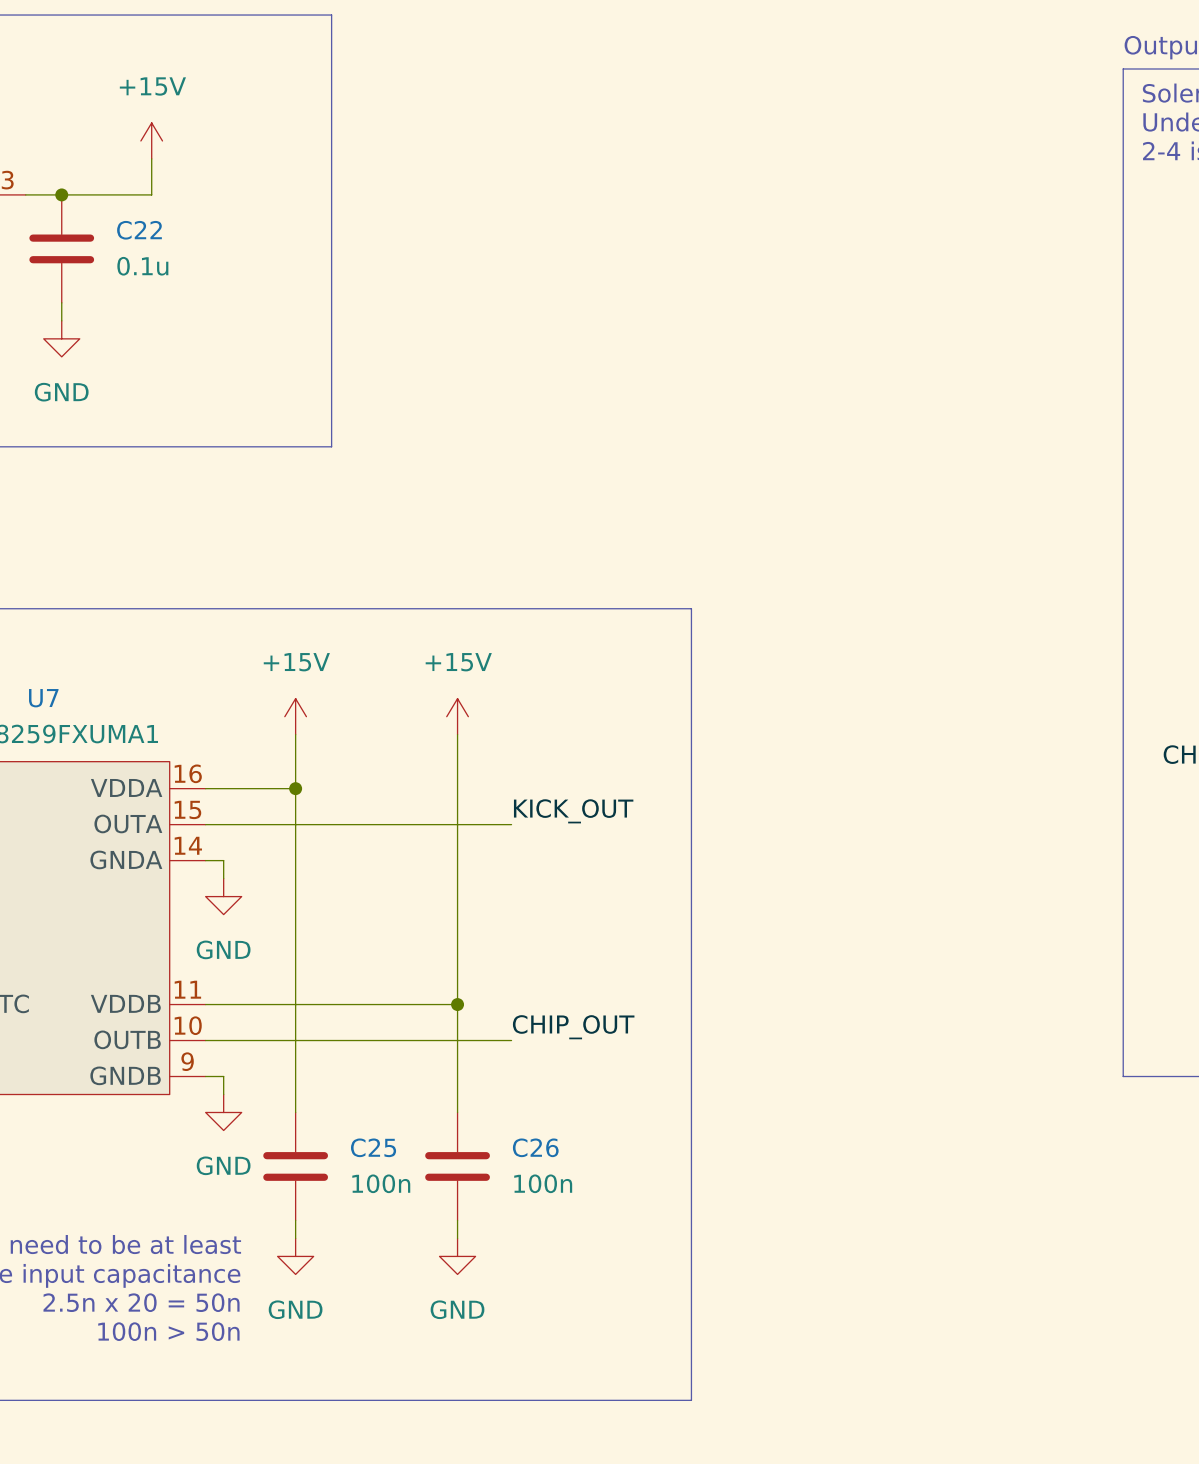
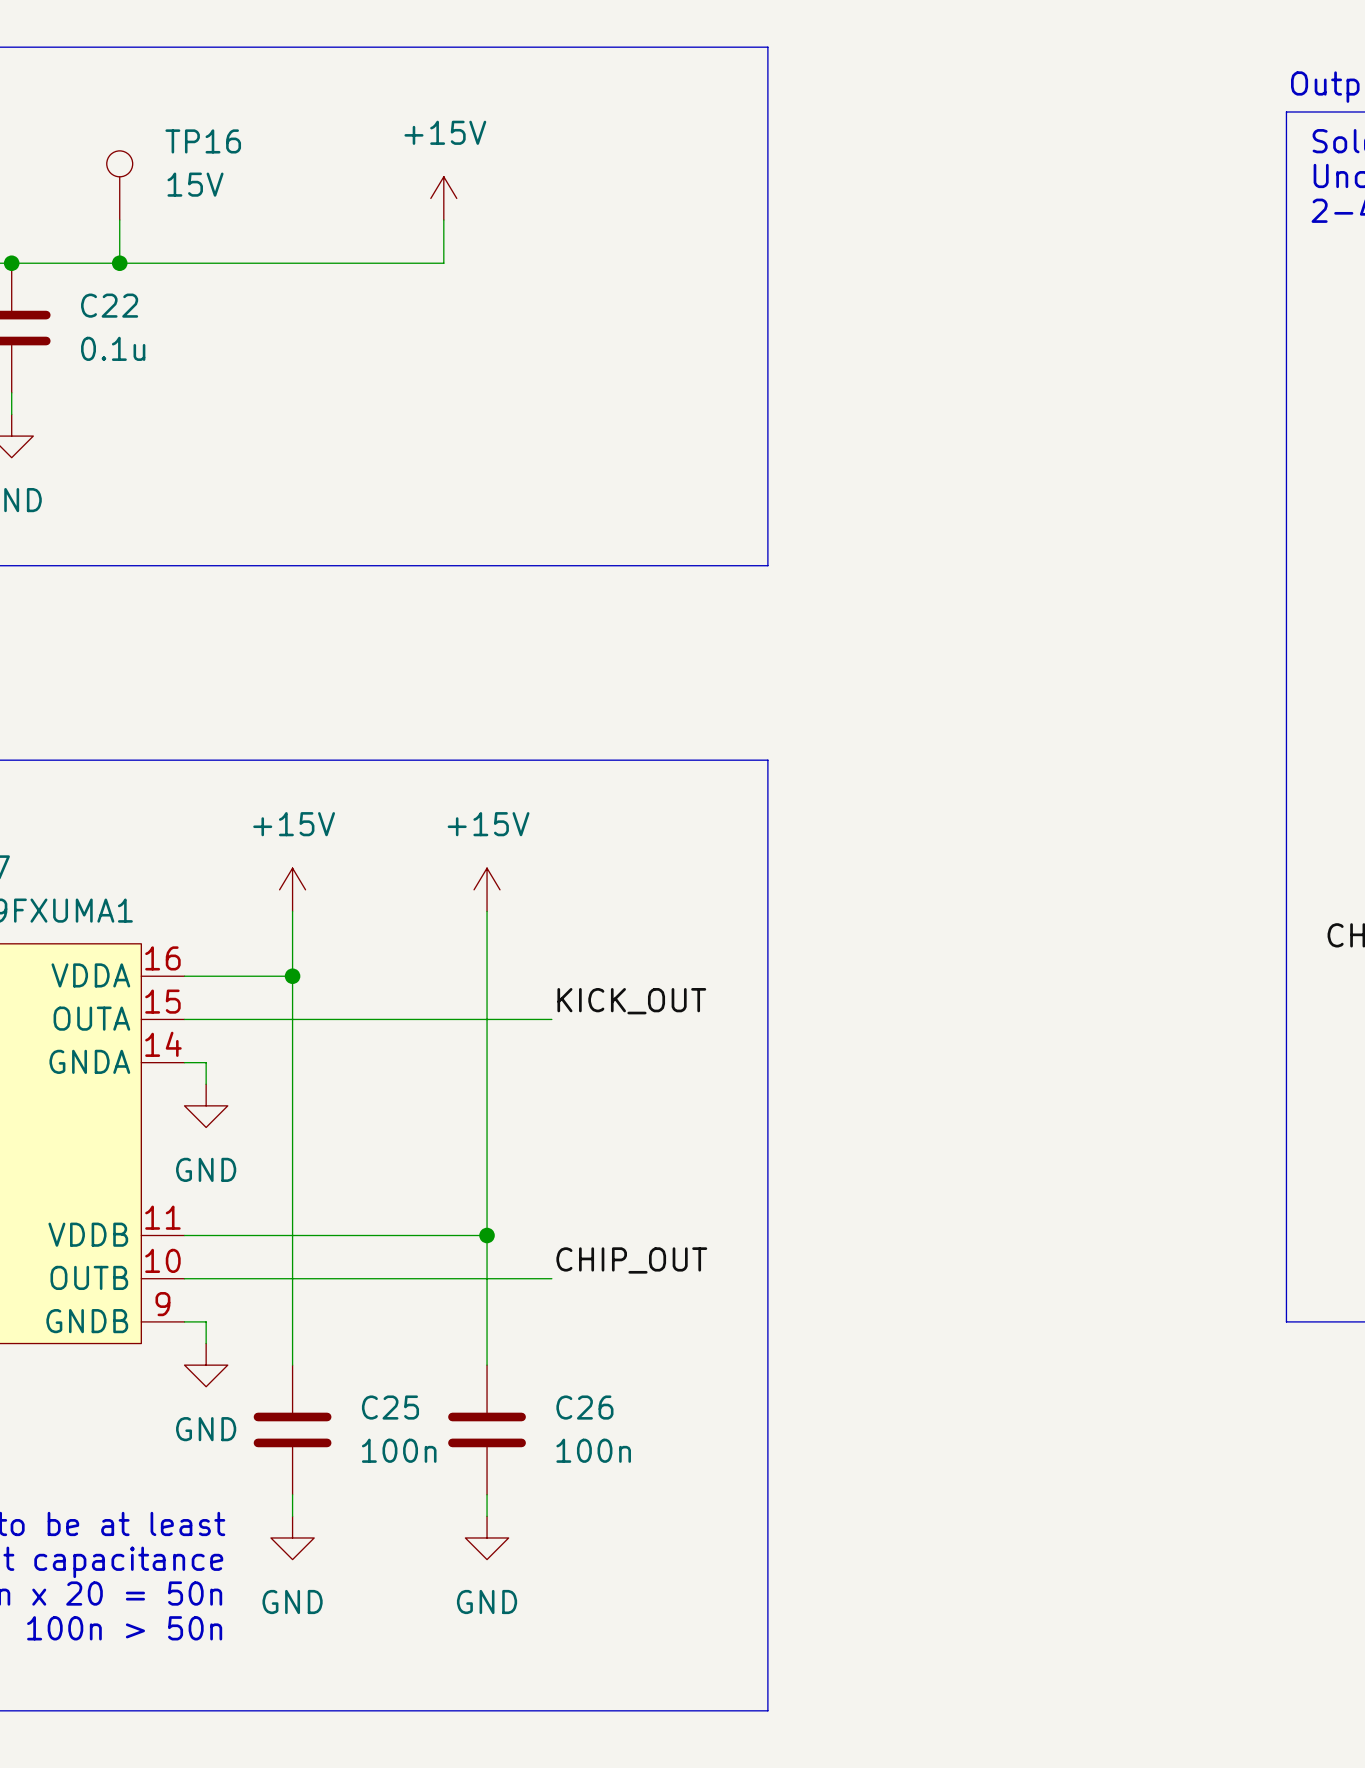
line: (331, 15) (331, 446) -> (335, 47) (767, 47) (767, 565) (335, 565)
TP16: none -> 15V (119, 185)
power symbol position: +15V (151, 140) -> +15V (443, 198)
wire: none -> (443, 220) (443, 263) (119, 263)
junction: none -> (119, 263)

